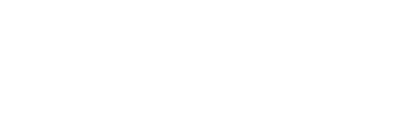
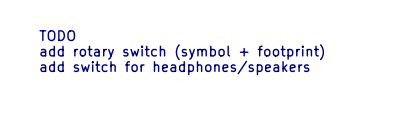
text: none -> TODO (57, 35)
text: none -> add rotary switch (symbol + footprint) (182, 52)
text: none -> add switch for headphones/speakers (174, 67)

